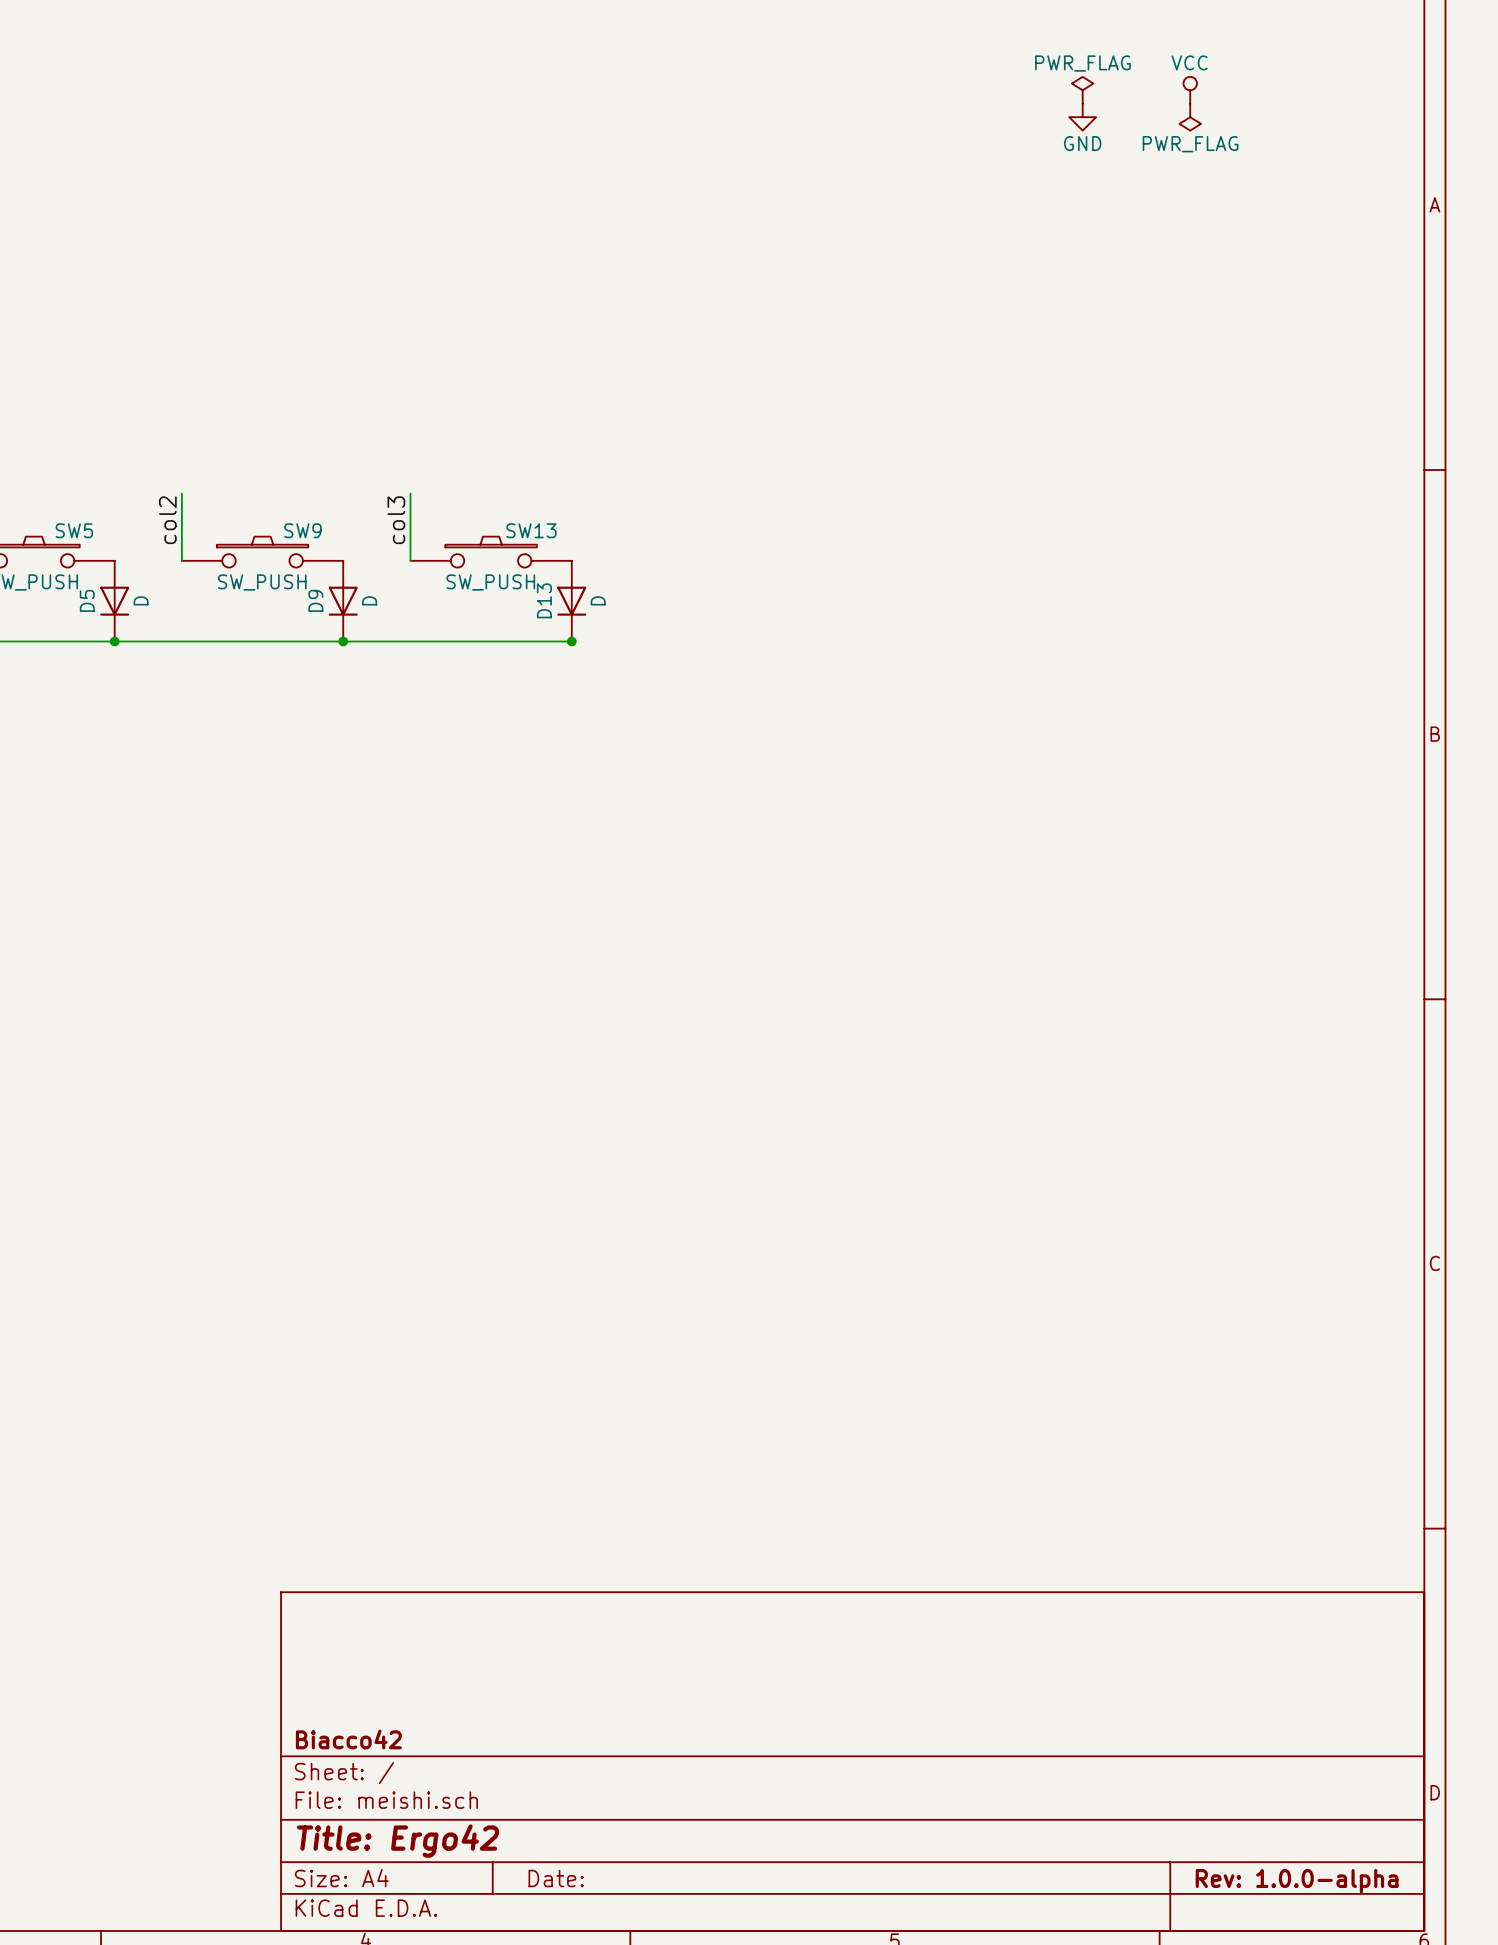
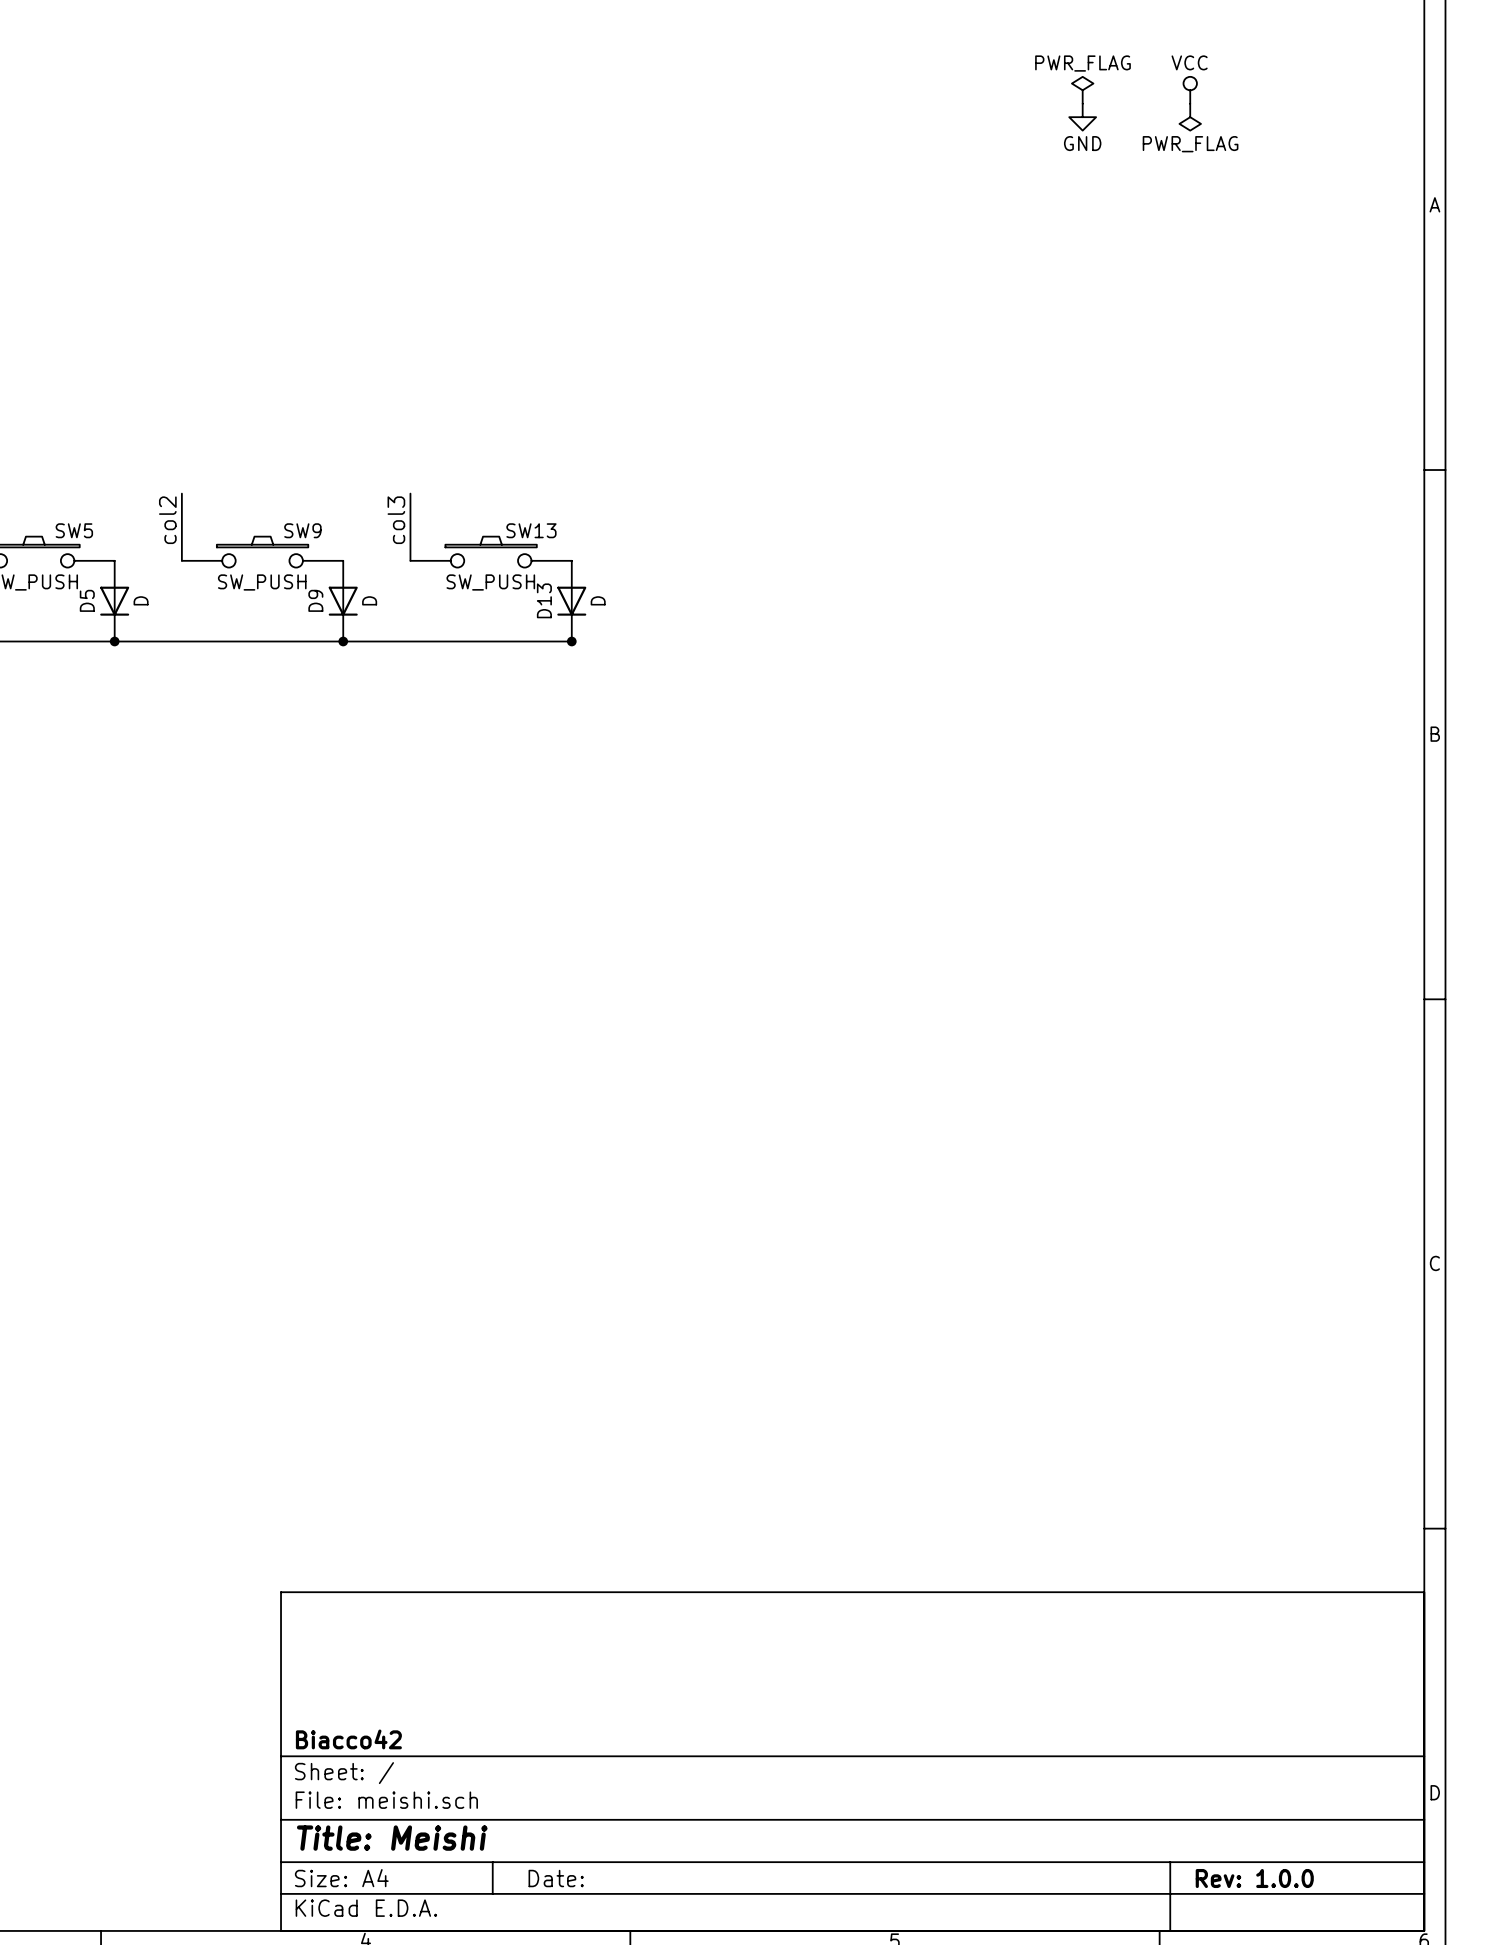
title block: Title: Ergo42 (398, 1841) -> Title: Meishi (392, 1838)
title block: Rev: 1.0.0-alpha (1297, 1881) -> Rev: 1.0.0 (1254, 1878)

